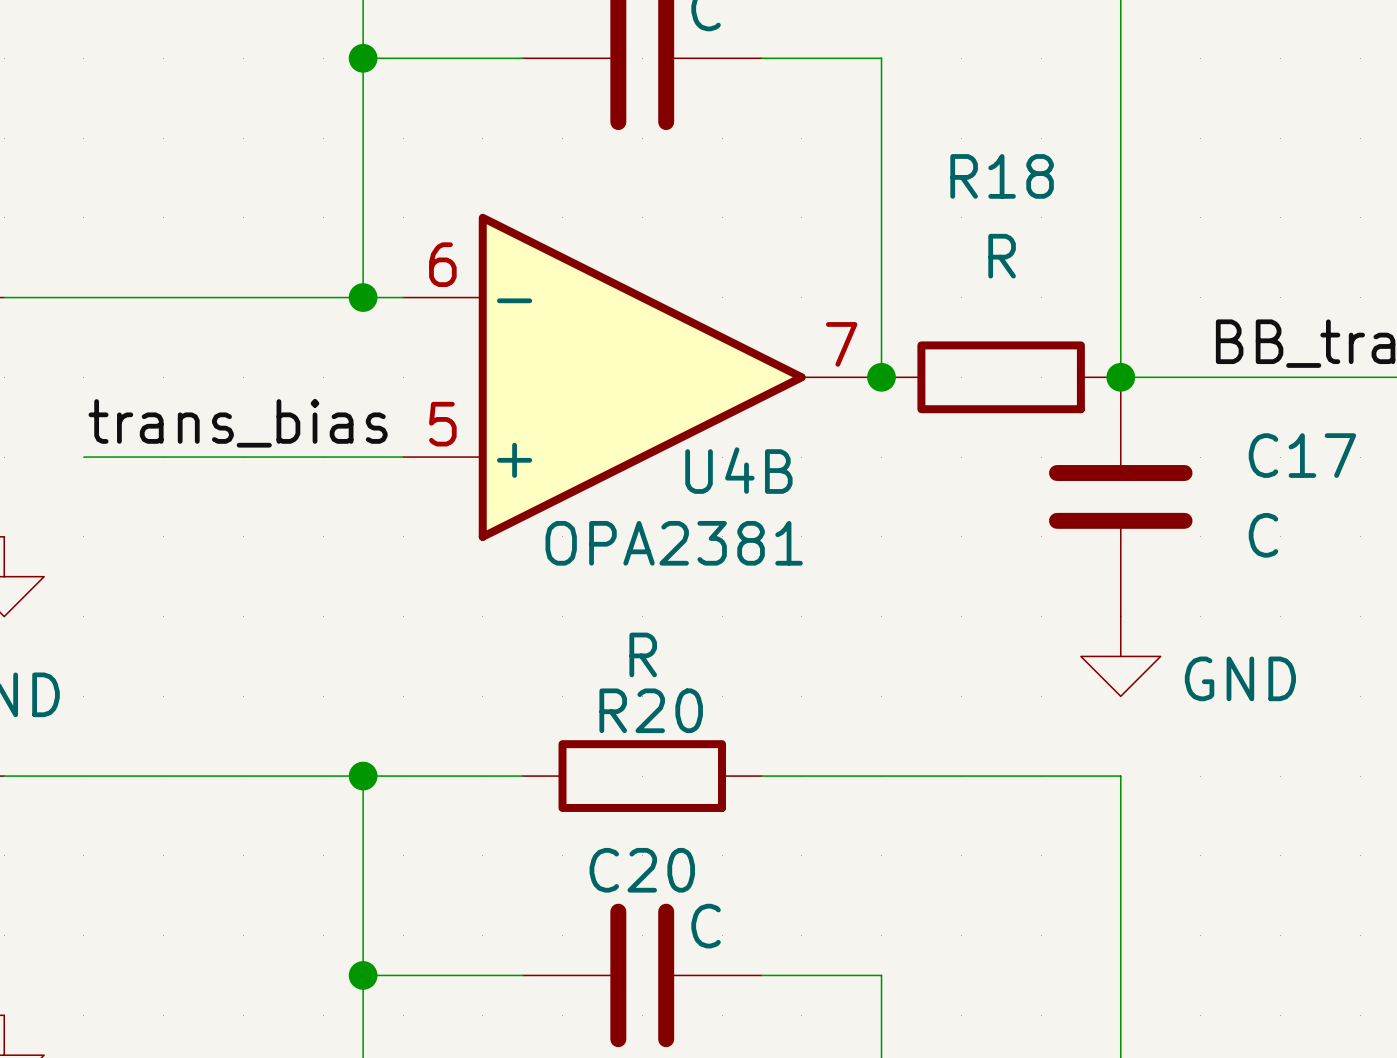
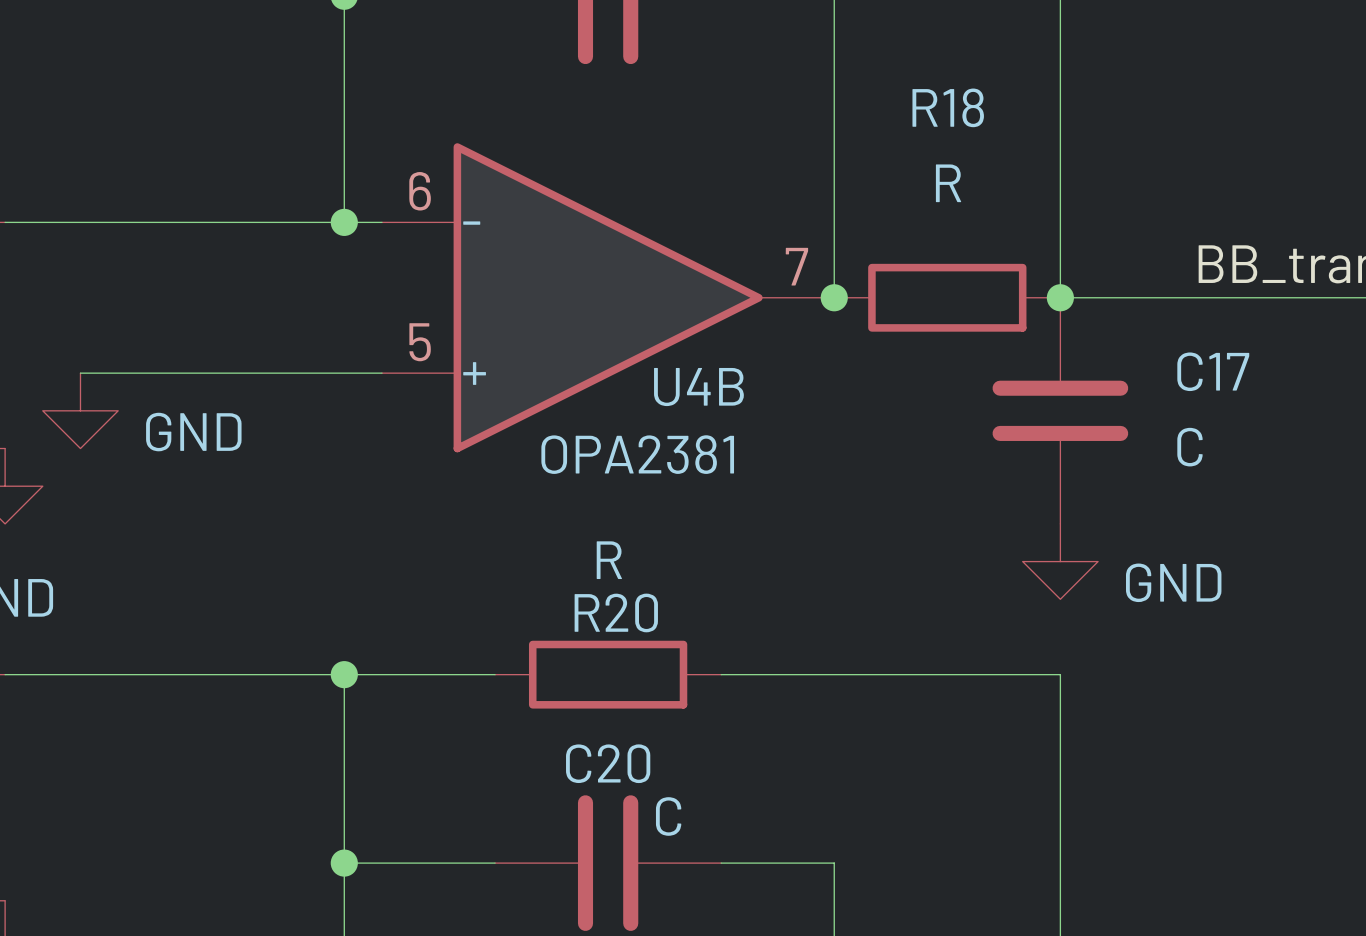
label: trans_bias (238, 423) -> none
power symbol: none -> GND (80, 410)

